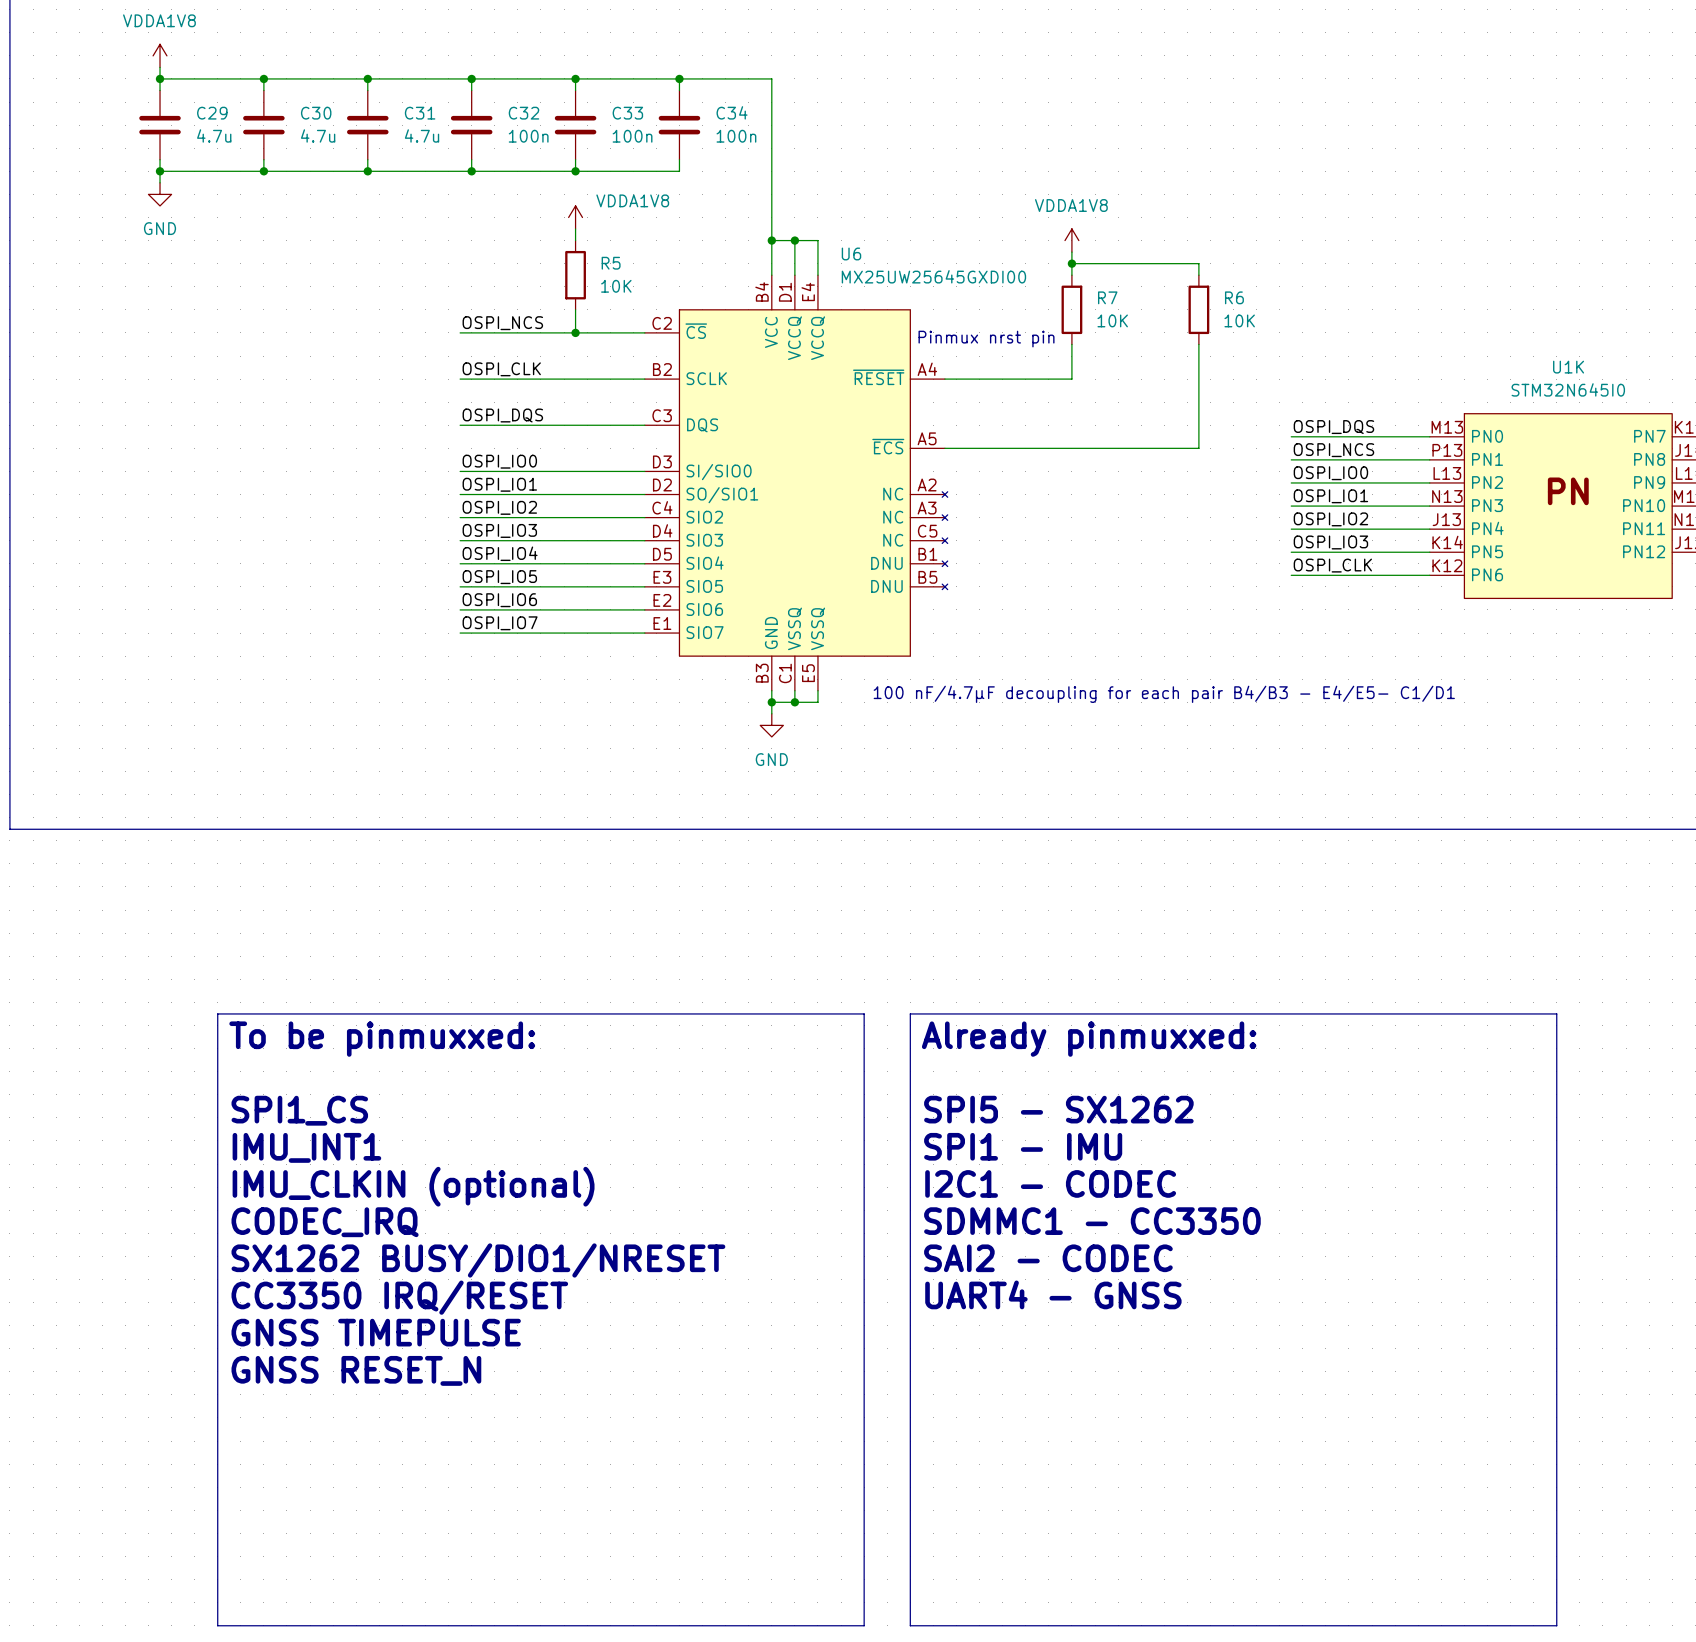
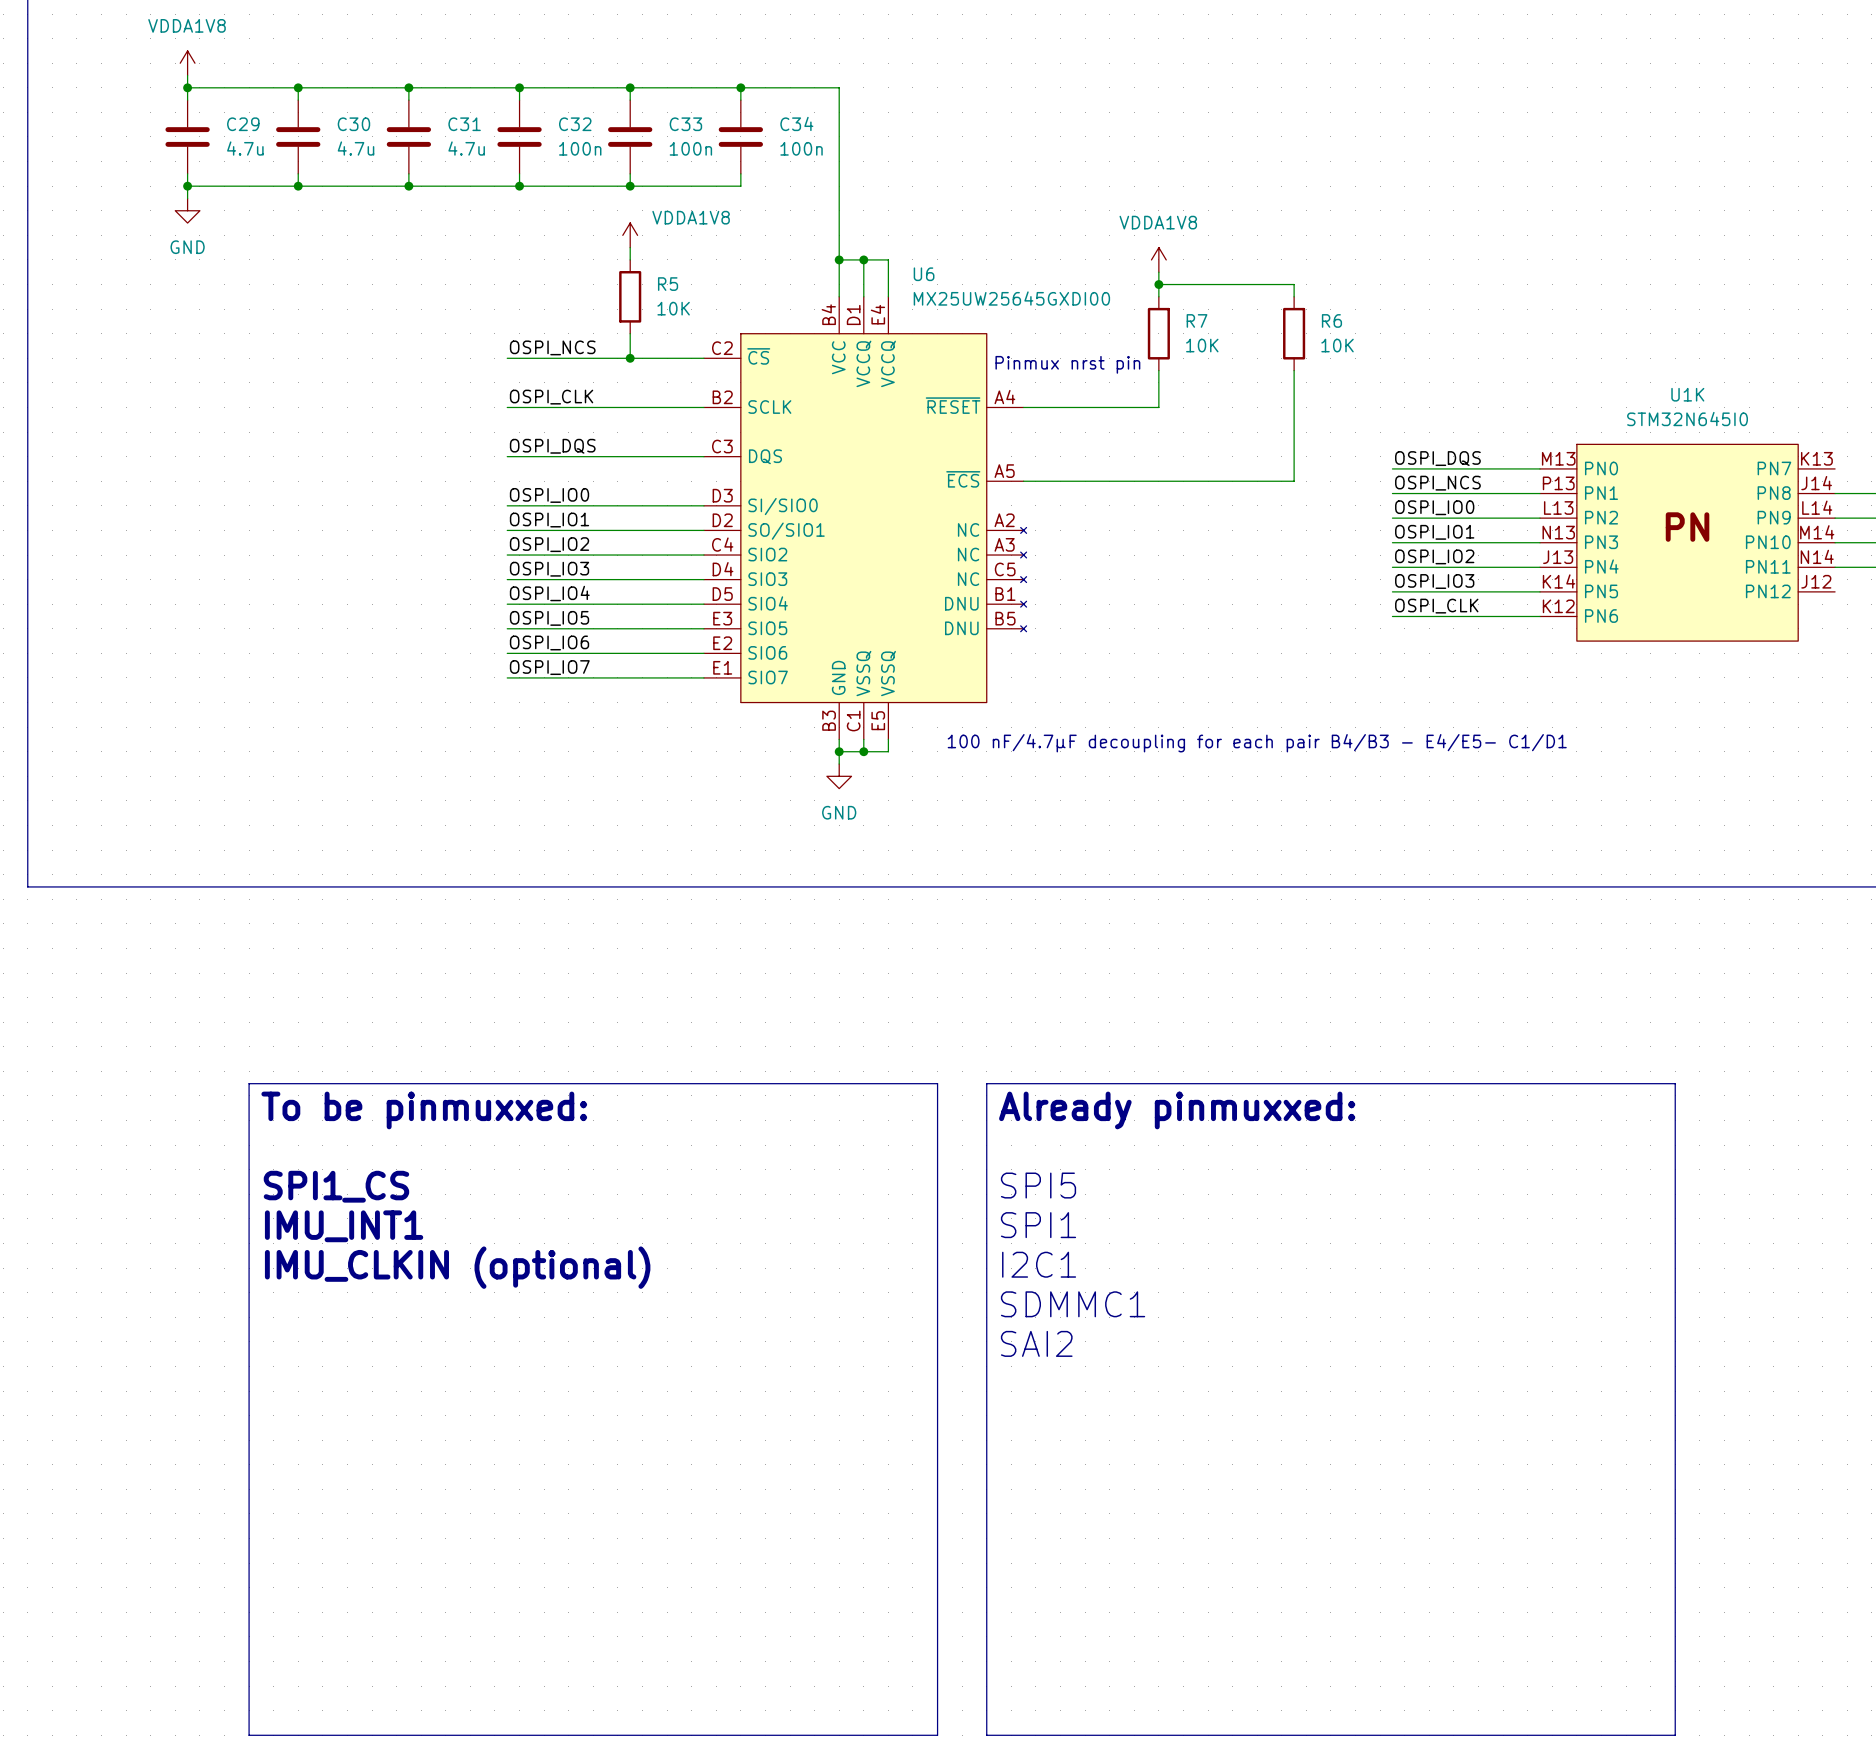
text: SPI5 - SX1262 (1058, 1109) -> SPI5 (1038, 1185)
text: SPI1 - IMU (1023, 1146) -> SPI1 (1038, 1225)
text: I2C1 - CODEC (1050, 1183) -> I2C1 (1039, 1264)
text: SDMMC1 - CC3350 (1092, 1221) -> SDMMC1 (1073, 1304)
text: CODEC_IRQ (325, 1222) -> none
text: SAI2 - CODEC (1048, 1258) -> SAI2 (1036, 1343)
text: SX1262 BUSY/DIO1/NRESET (478, 1260) -> none
text: UART4 - GNSS (1053, 1294) -> none
text: CC3350 IRQ/RESET (399, 1297) -> none
text: GNSS TIMEPULSE (376, 1332) -> none
text: GNSS RESET_N (356, 1370) -> none

